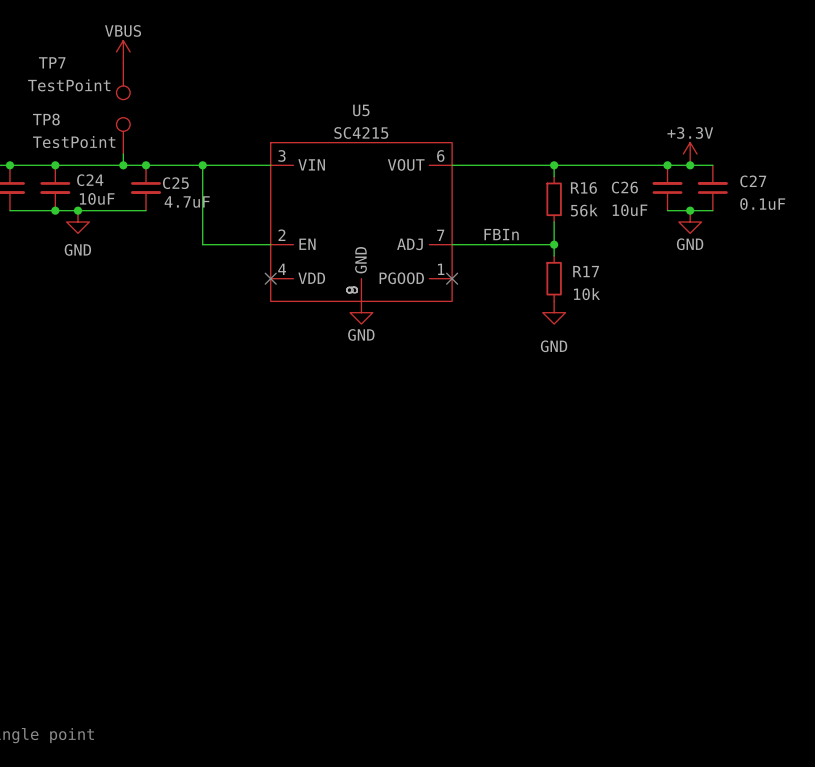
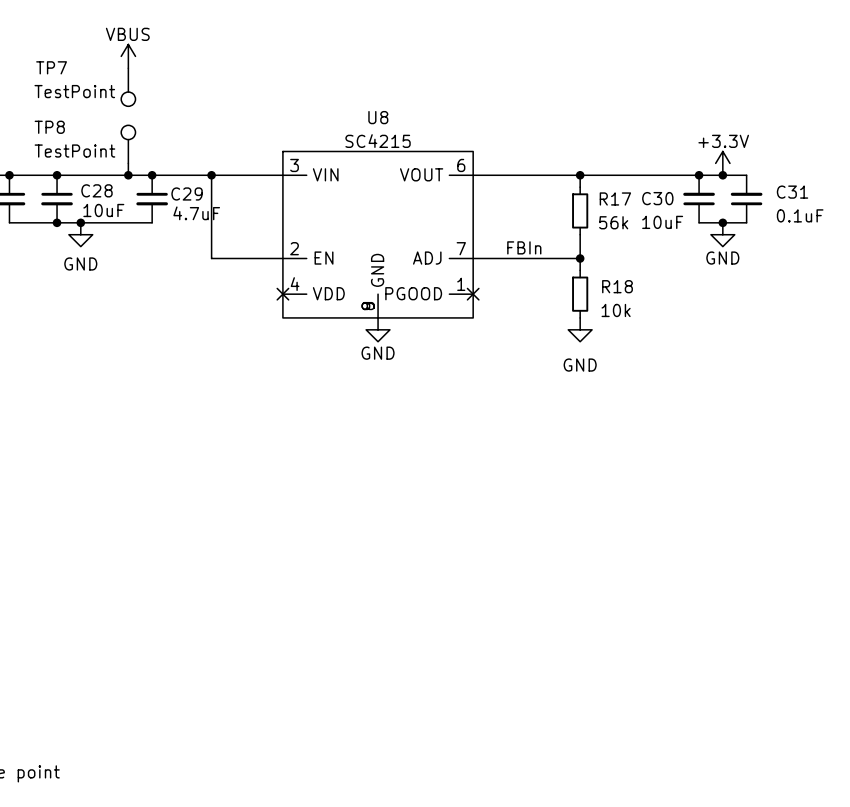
U5 name: U5 (361, 110) -> U8 (378, 117)
C24 name: C24 (90, 180) -> C28 (96, 190)
C27 name: C27 (753, 181) -> C31 (792, 192)
C25 name: C25 (175, 183) -> C29 (187, 193)
R16 name: R16 (583, 187) -> R17 (615, 198)
C26 name: C26 (624, 187) -> C30 (657, 198)
R17 name: R17 (586, 271) -> R18 (617, 286)

